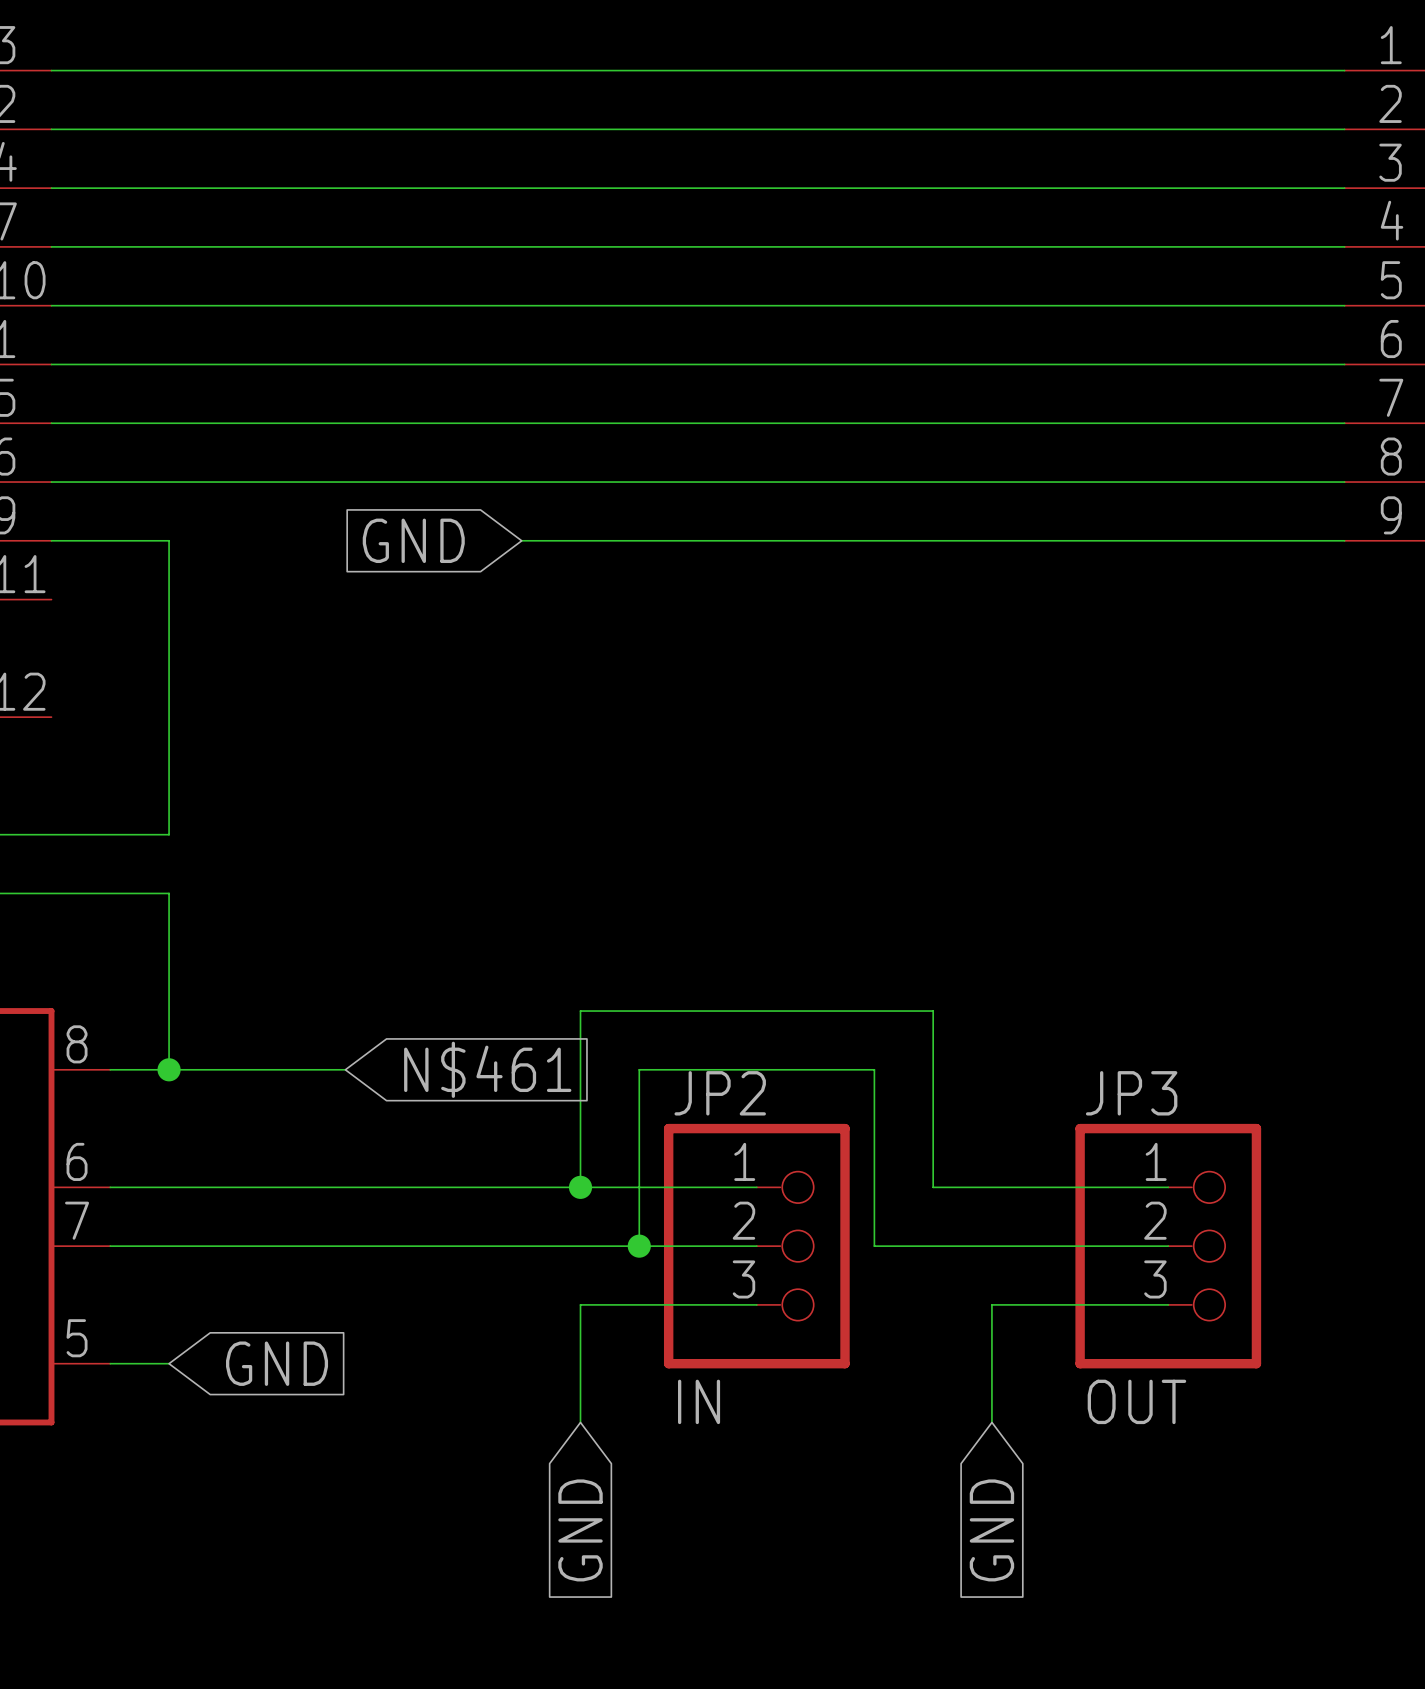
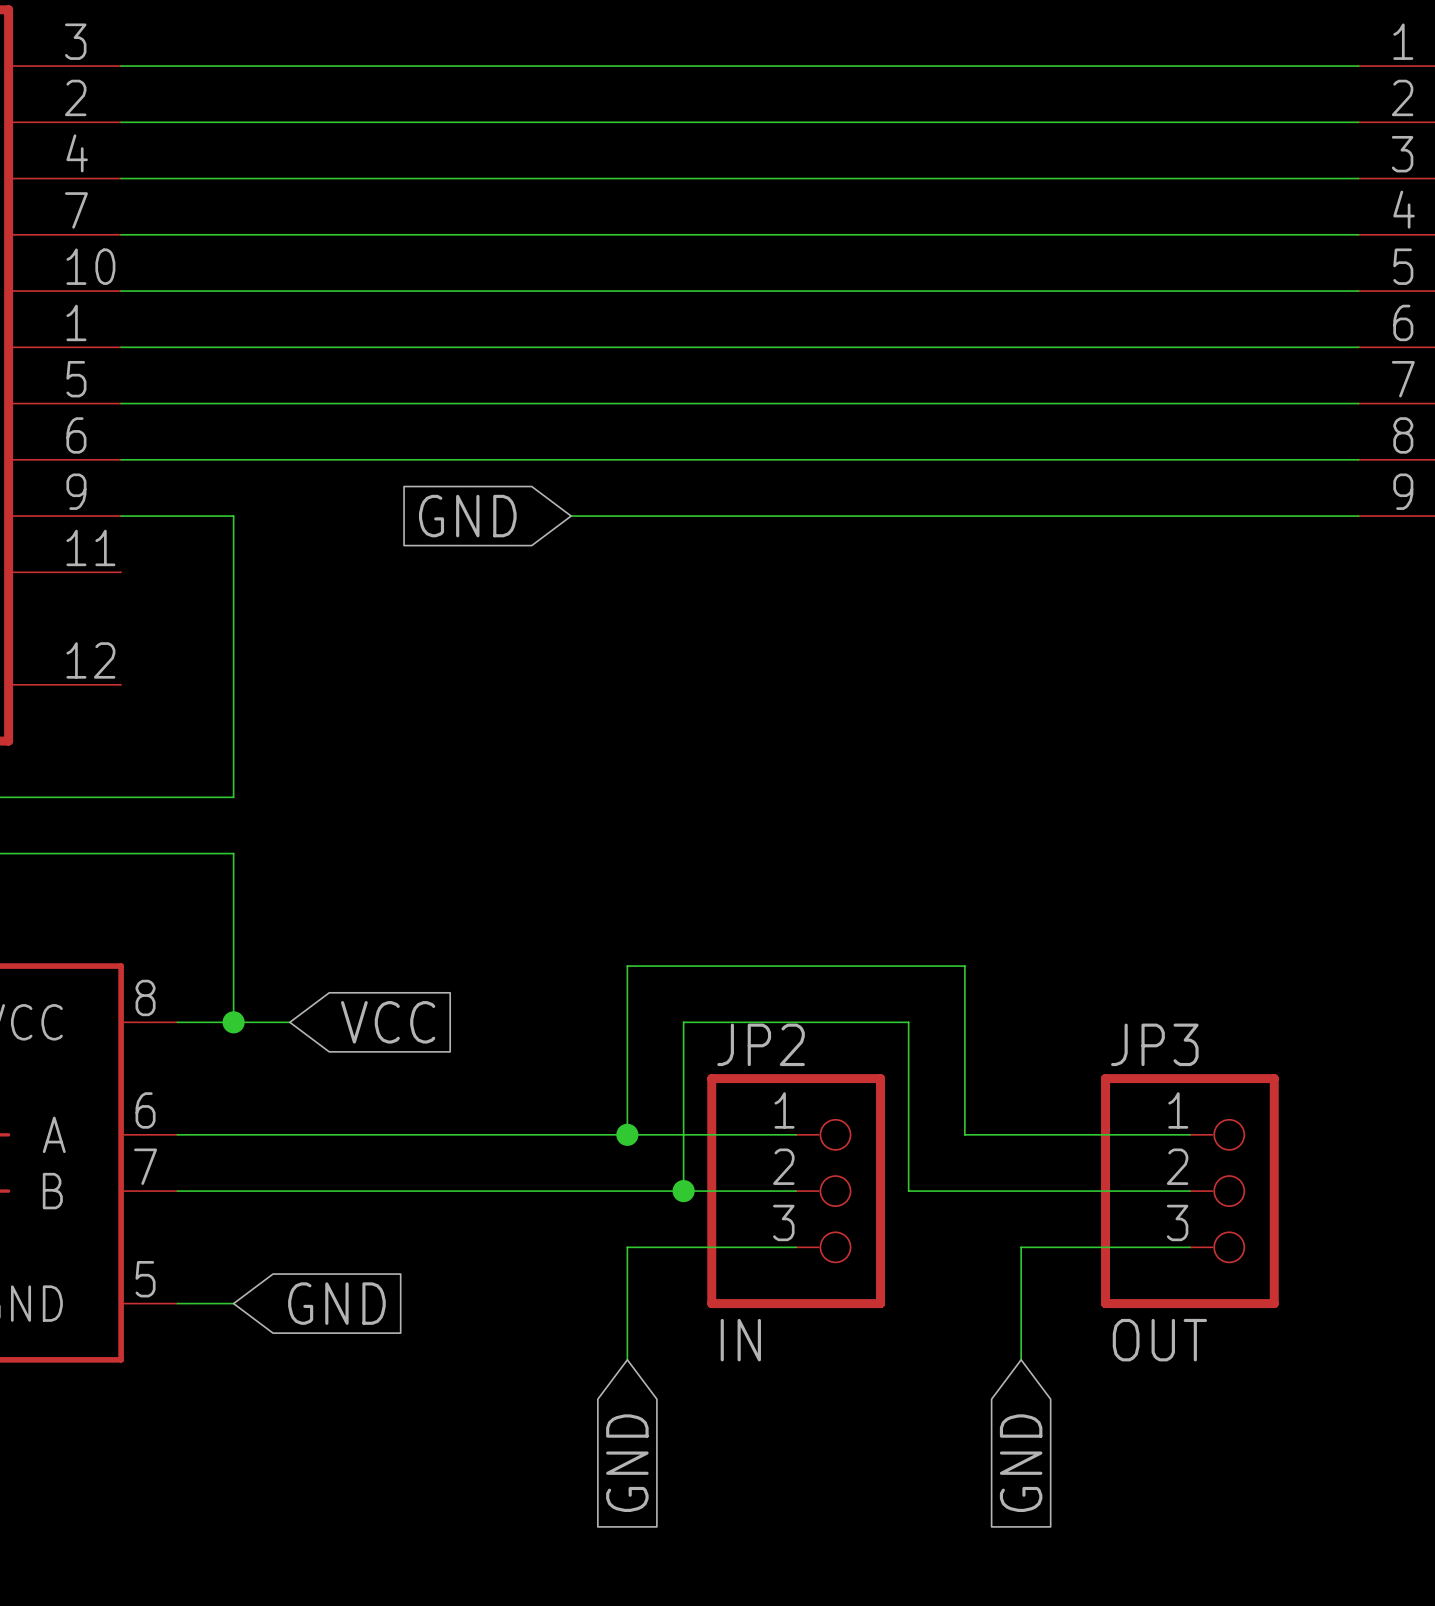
wire: (227, 1069) (345, 1069) -> none
global label: none -> VCC (388, 1022)
global label: N$461 (487, 1069) -> none

